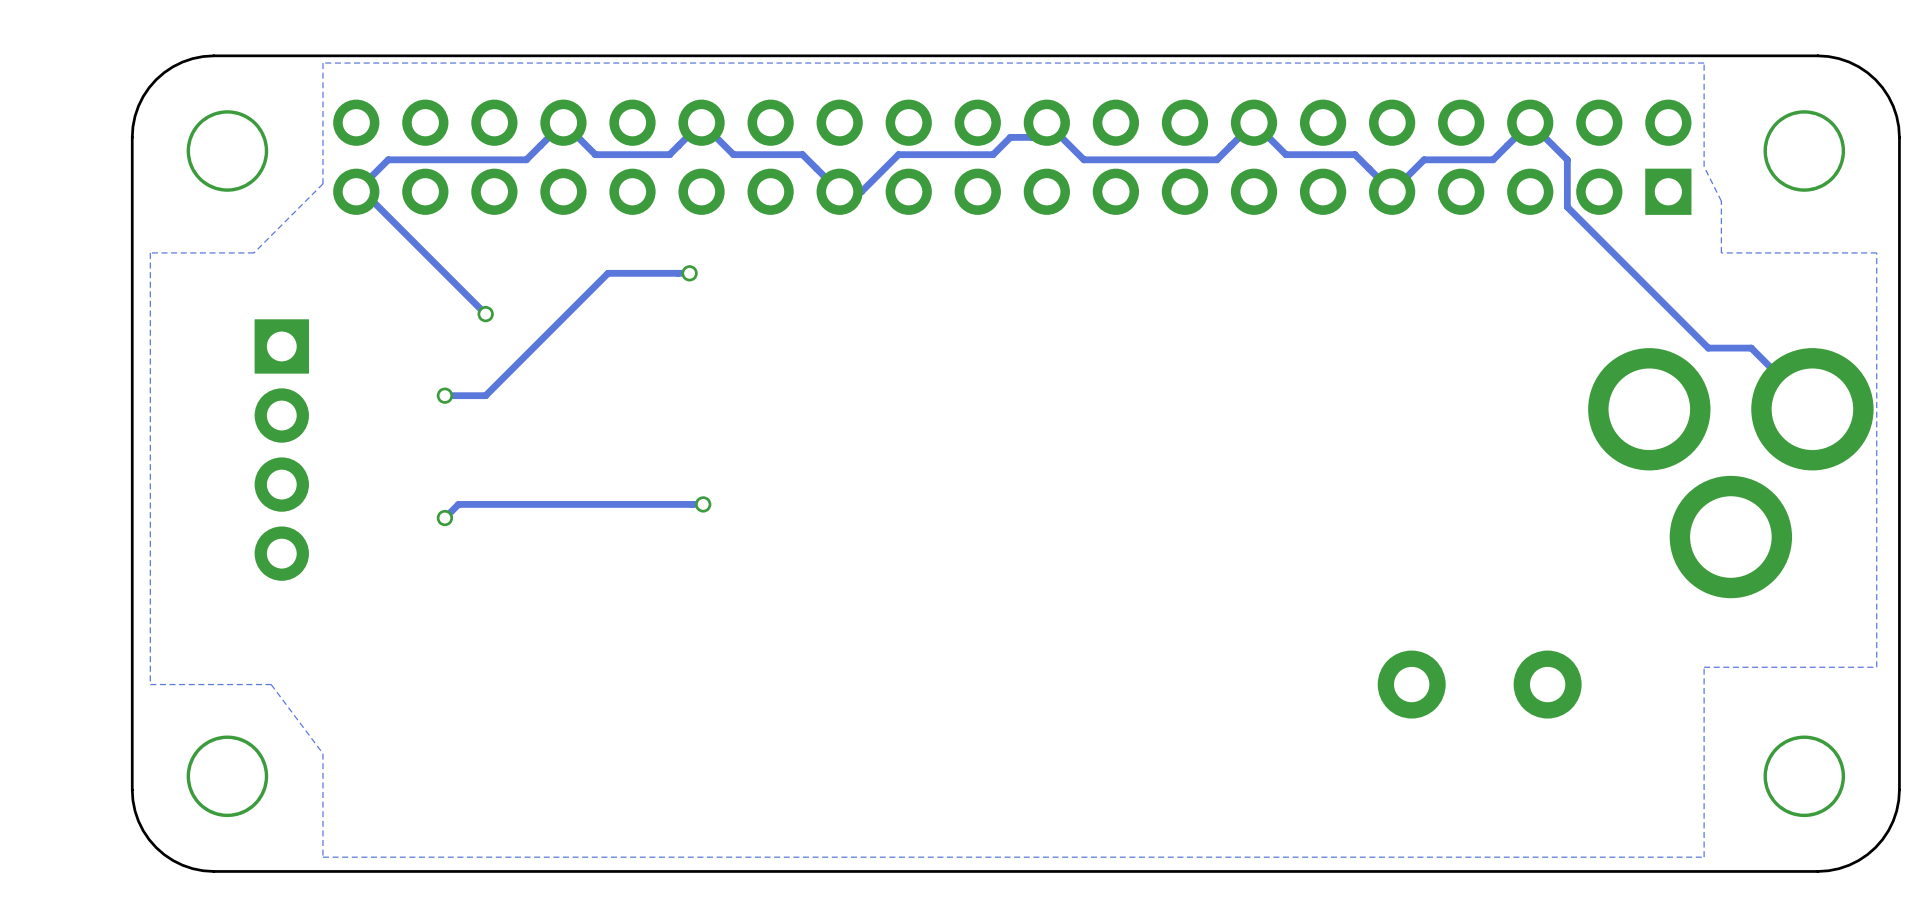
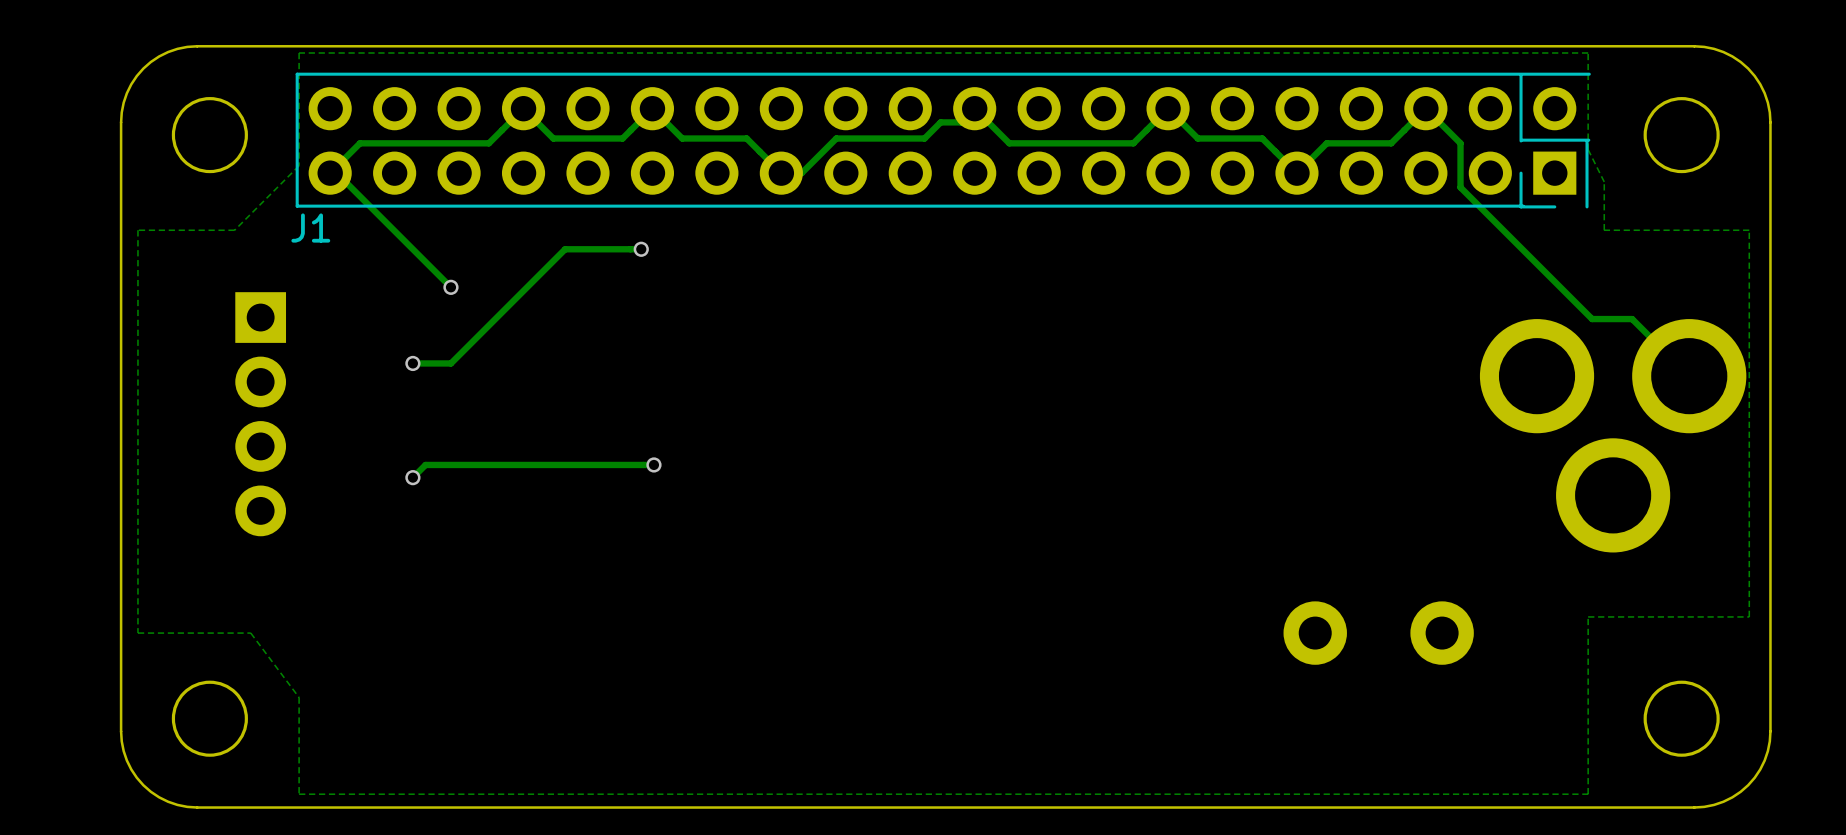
J1: none -> (943, 140)

